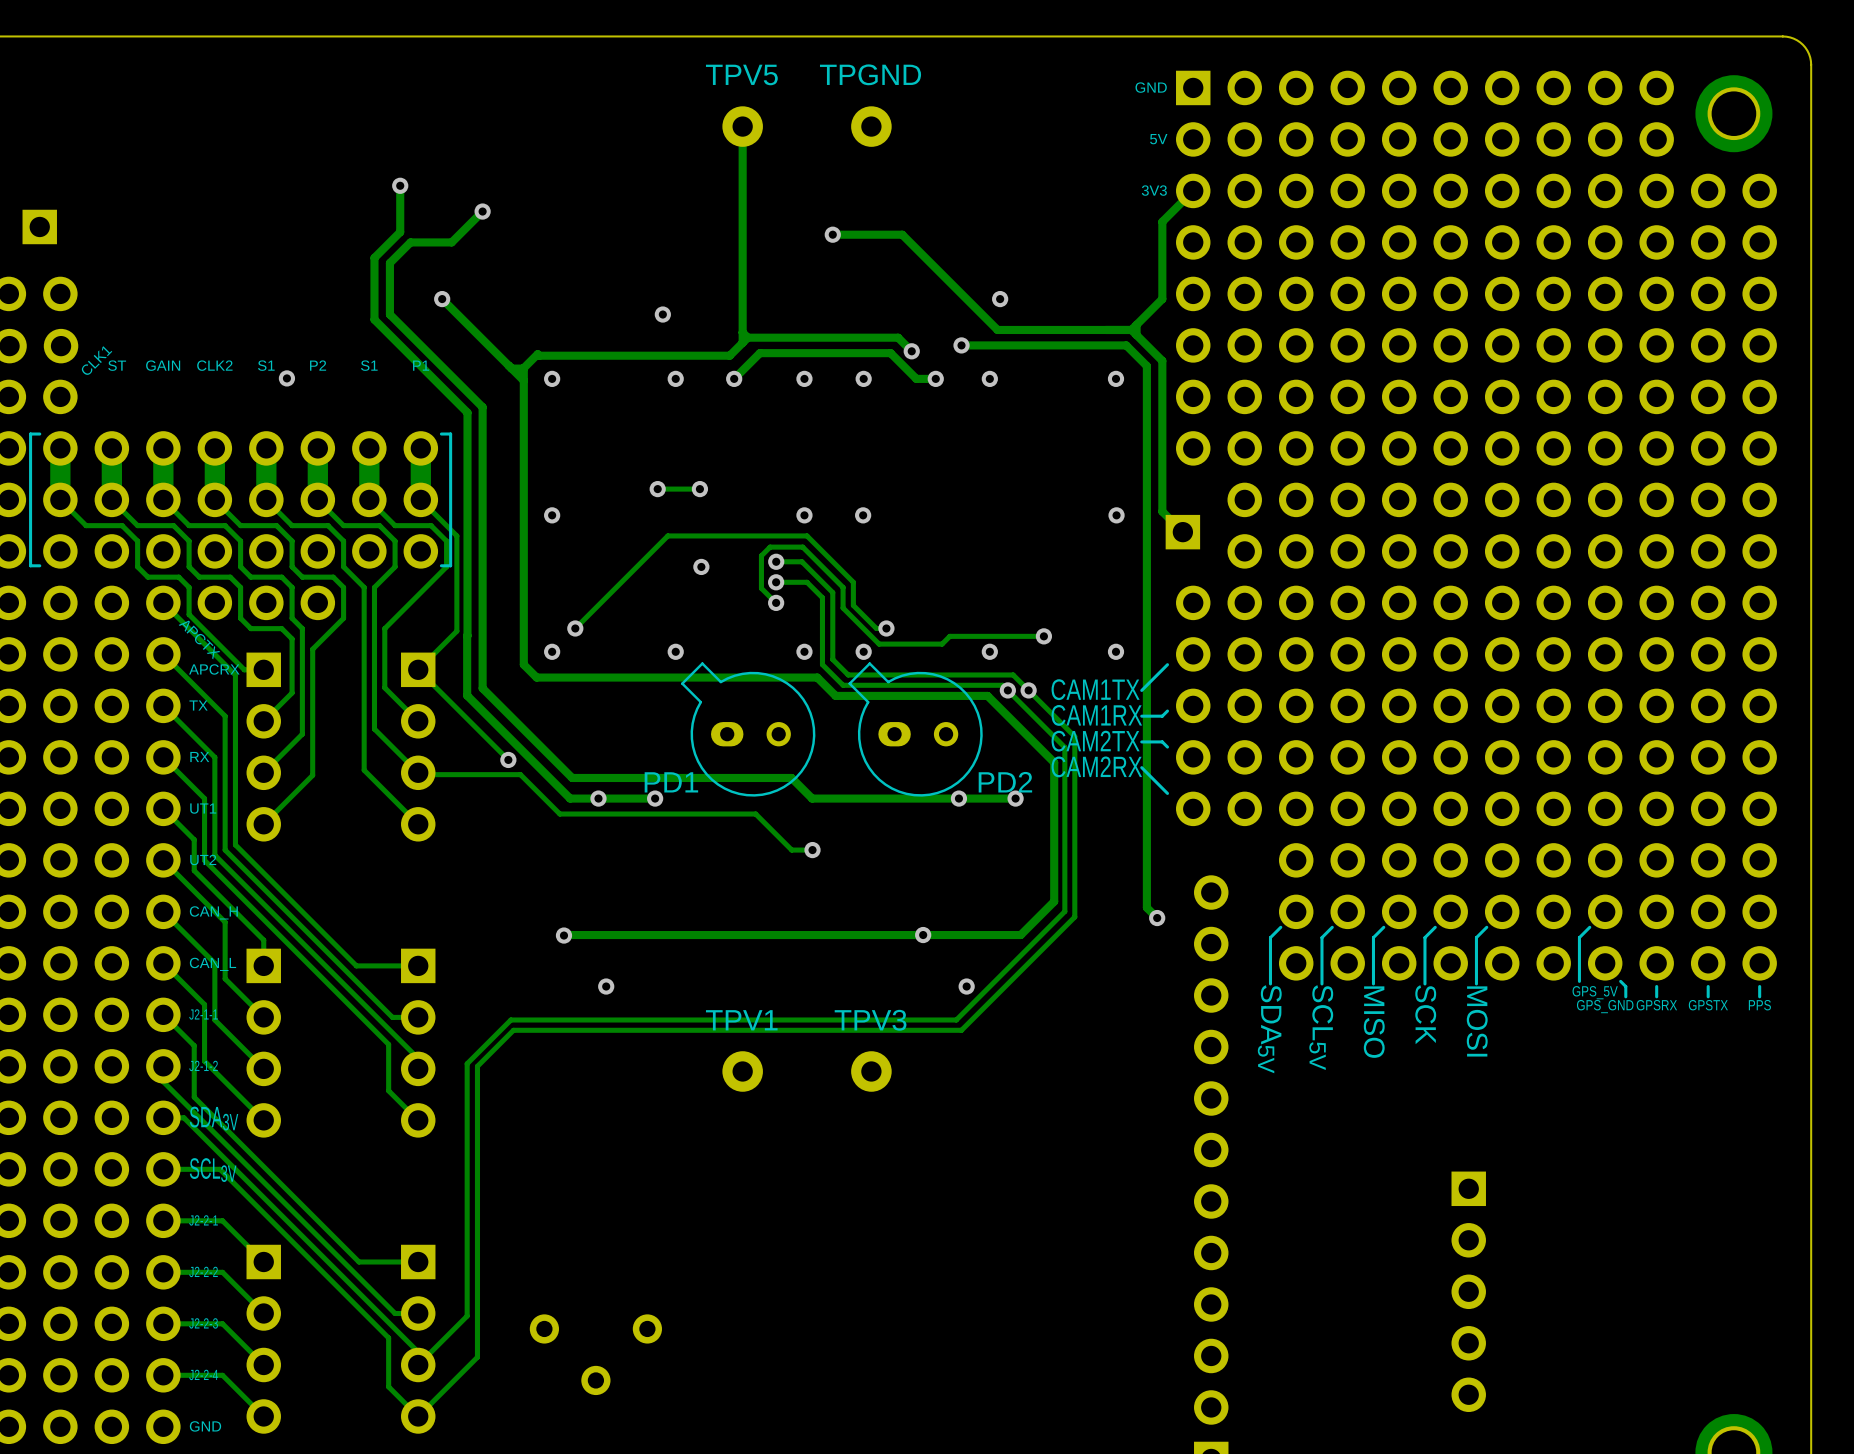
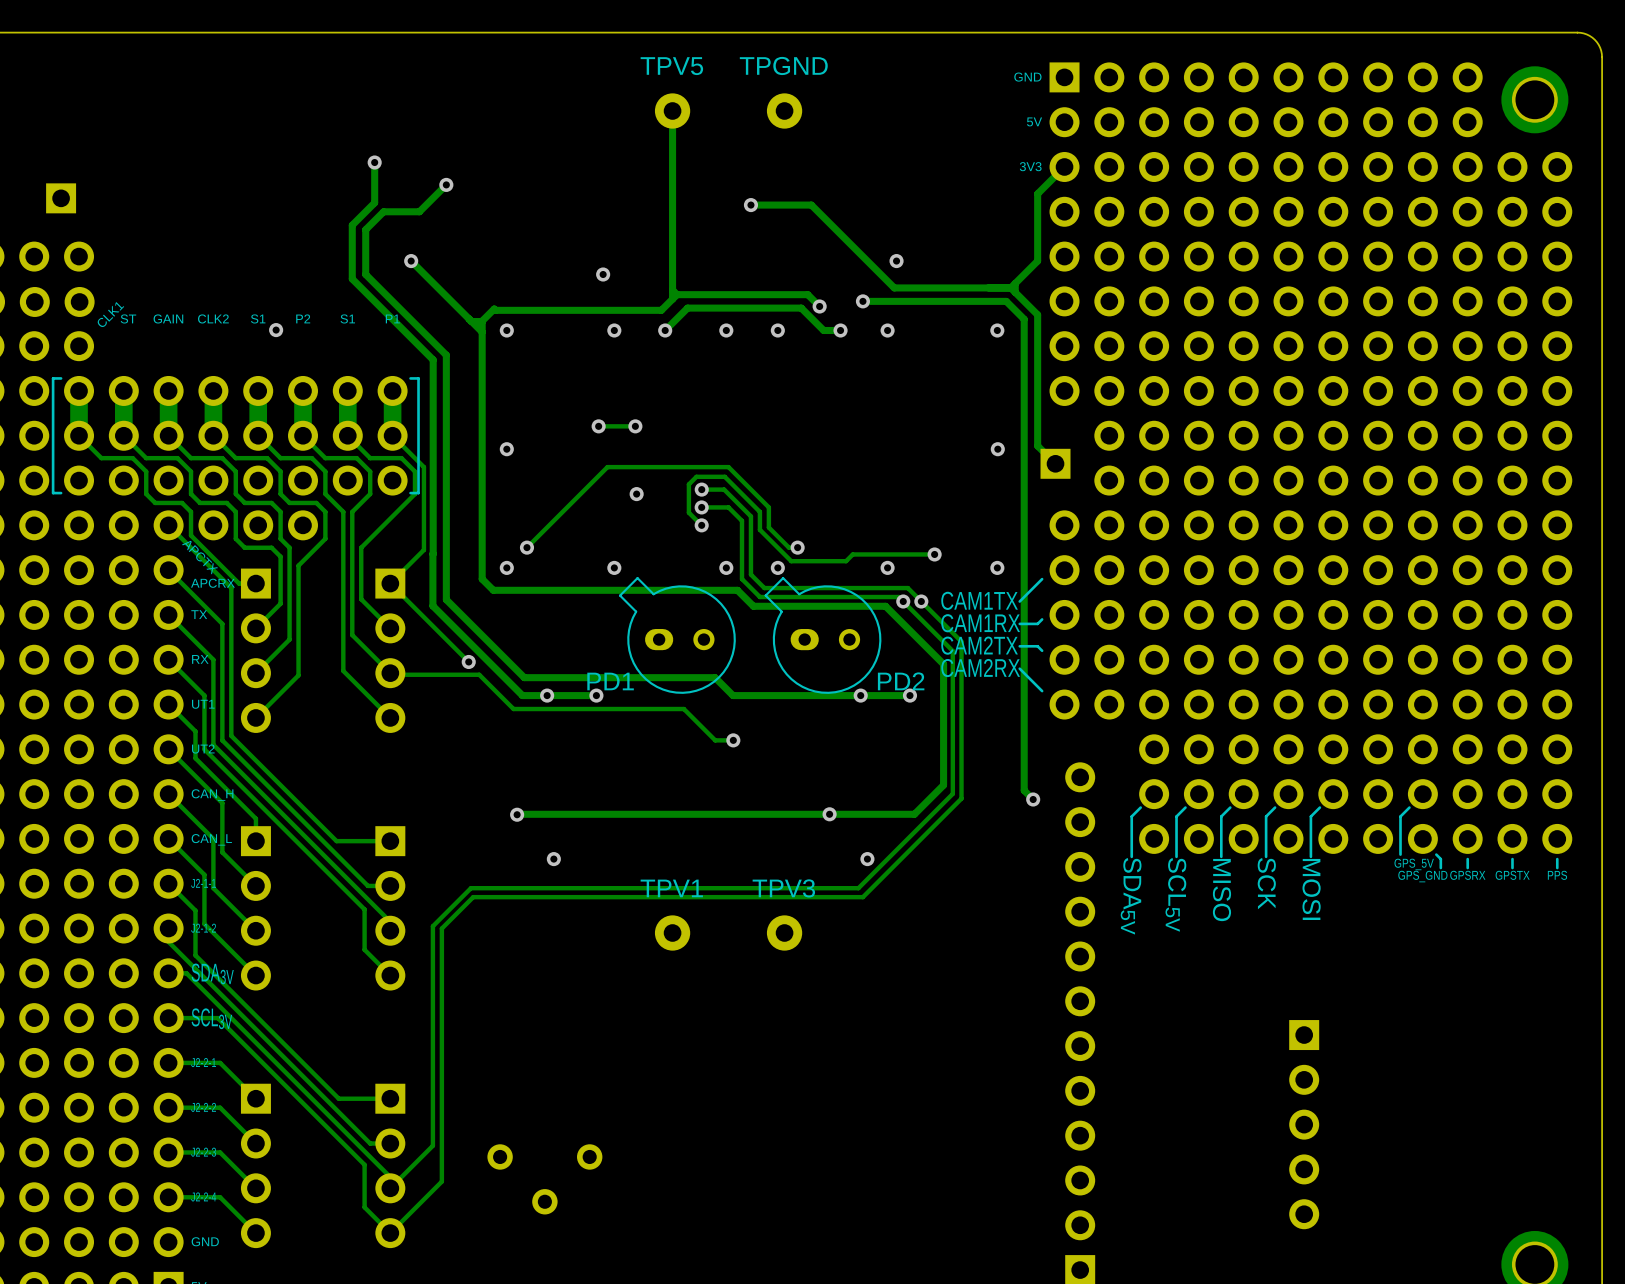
via: (804, 515) -> none
via: (863, 515) -> none

